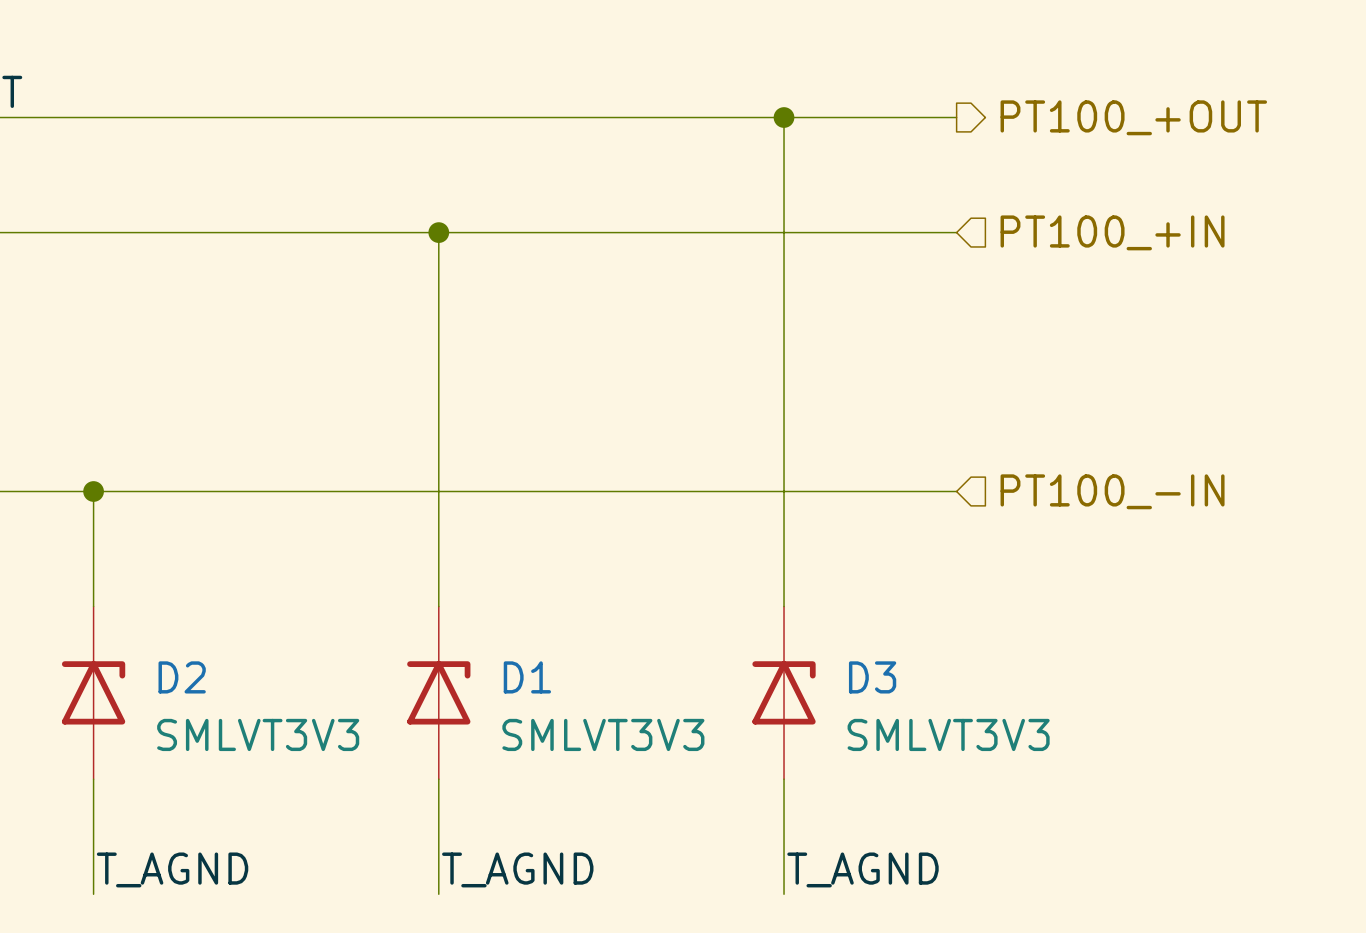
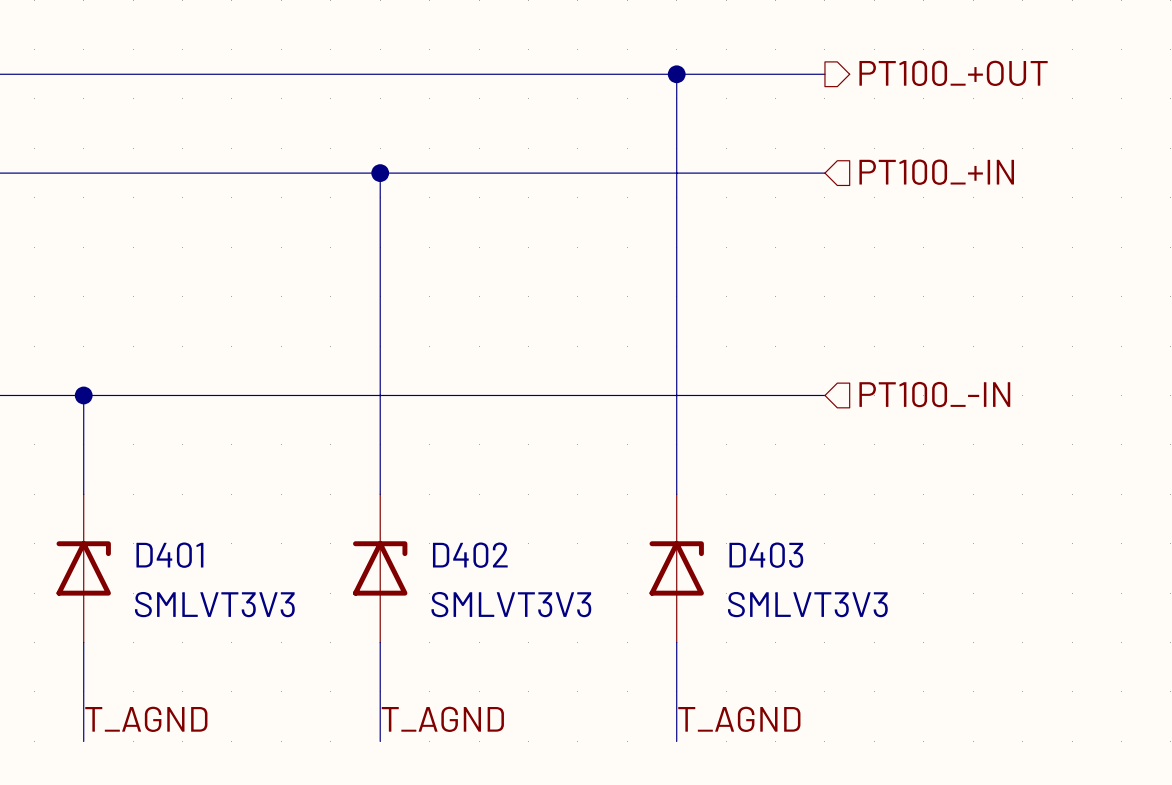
D2 name: D2 (182, 677) -> D401 (169, 555)
D1 name: D1 (527, 677) -> D402 (470, 555)
D3 name: D3 (872, 677) -> D403 (766, 555)

